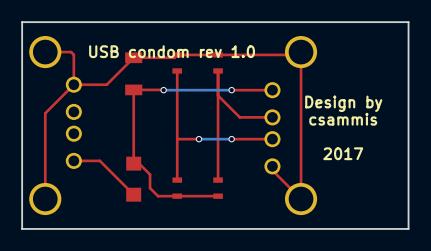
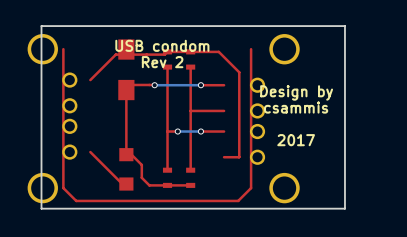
board edge: (408, 22) (22, 22) (22, 228) (408, 228) (408, 22) -> (344, 26) (344, 208) (41, 208) (41, 26) (344, 26)
text: USB condom rev 1.0 (172, 51) -> USB condom (162, 45)
top track: (45, 52) (71, 52) (73, 54) (73, 84) -> none
part footprint: [125, 52, 143, 96] -> [118, 39, 135, 101]
top track: none -> (251, 49) (251, 188) (238, 200) (76, 200) (63, 188) (63, 49)
top track: (231, 54) (298, 54) (301, 52) (301, 199) (272, 170) (272, 166) -> (218, 51) (239, 72) (239, 156) (224, 157)
top track: (133, 57) (106, 84) (73, 84) -> (126, 54) (115, 54) (90, 80)
part position: (218, 62) -> (190, 59)
text: none -> Rev 2 (162, 62)
top track: (218, 70) (218, 180) -> (190, 67) (190, 170)
top track: (73, 84) (45, 113) (45, 199) -> none
top track: none -> (218, 85) (200, 85)
bottom track: (231, 90) (212, 90) -> none
via position: (231, 90) -> (200, 85)
top track: (272, 90) (237, 90) -> none
top track: (218, 95) (239, 117) (272, 117) -> none
text position: Design by (343, 103) -> Design by (296, 92)
text position: csammis (343, 119) -> csammis (296, 107)
via: none -> (177, 131)
top track: (199, 139) (188, 139) -> none
bottom track: none -> (188, 131) (177, 131)
via: (199, 139) -> none
via: none -> (200, 131)
top track: none -> (218, 131) (200, 131)
bottom track: (231, 139) (212, 139) -> none
via: (231, 139) -> none
top track: (272, 139) (237, 139) -> (224, 110) (190, 110)
text position: 2017 (343, 153) -> 2017 (296, 140)
top track: (73, 160) (99, 160) (133, 194) -> (90, 152) (122, 184) (126, 184)
part position: (218, 188) -> (190, 177)
top track: (218, 196) (201, 196) -> none

